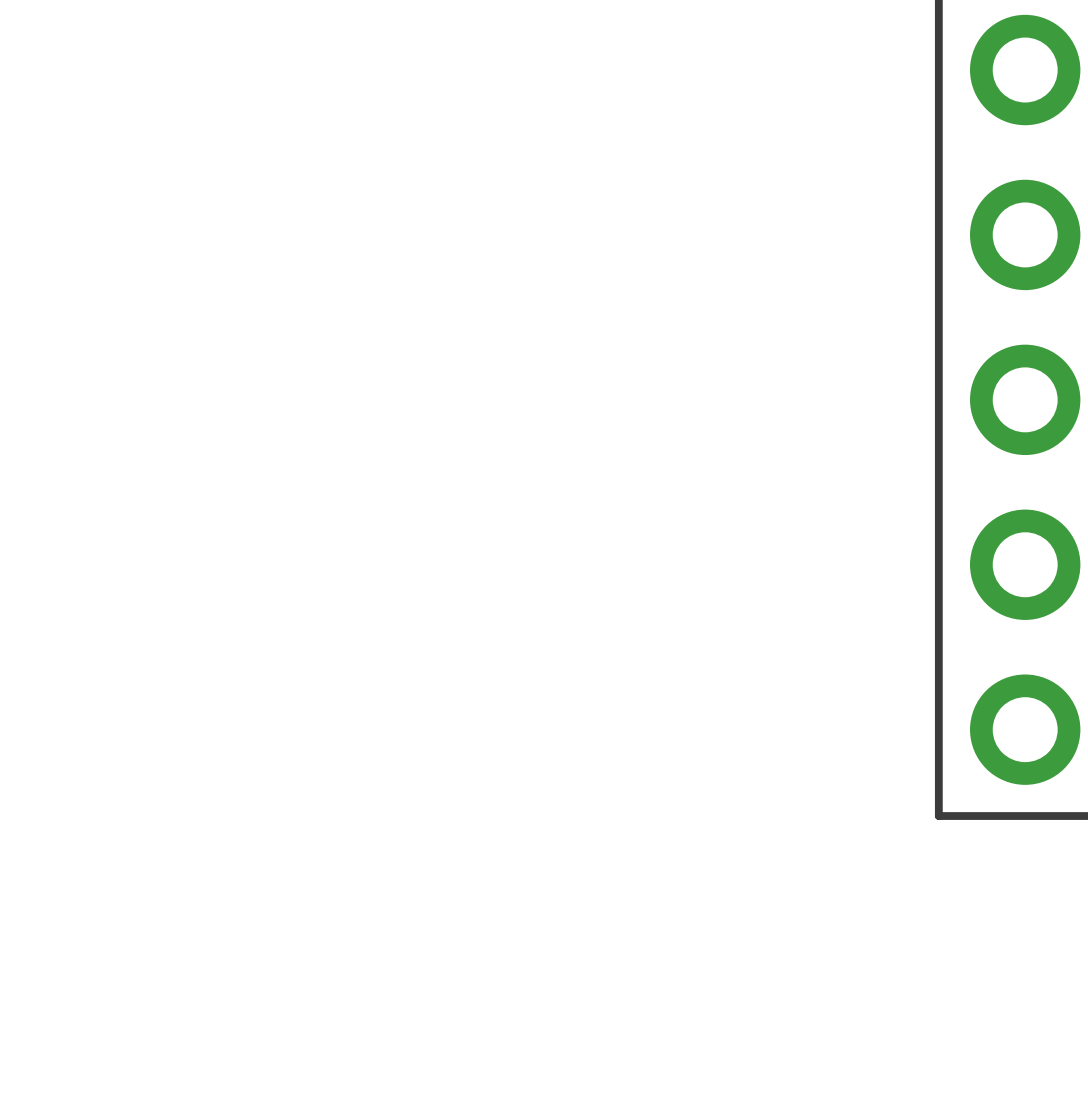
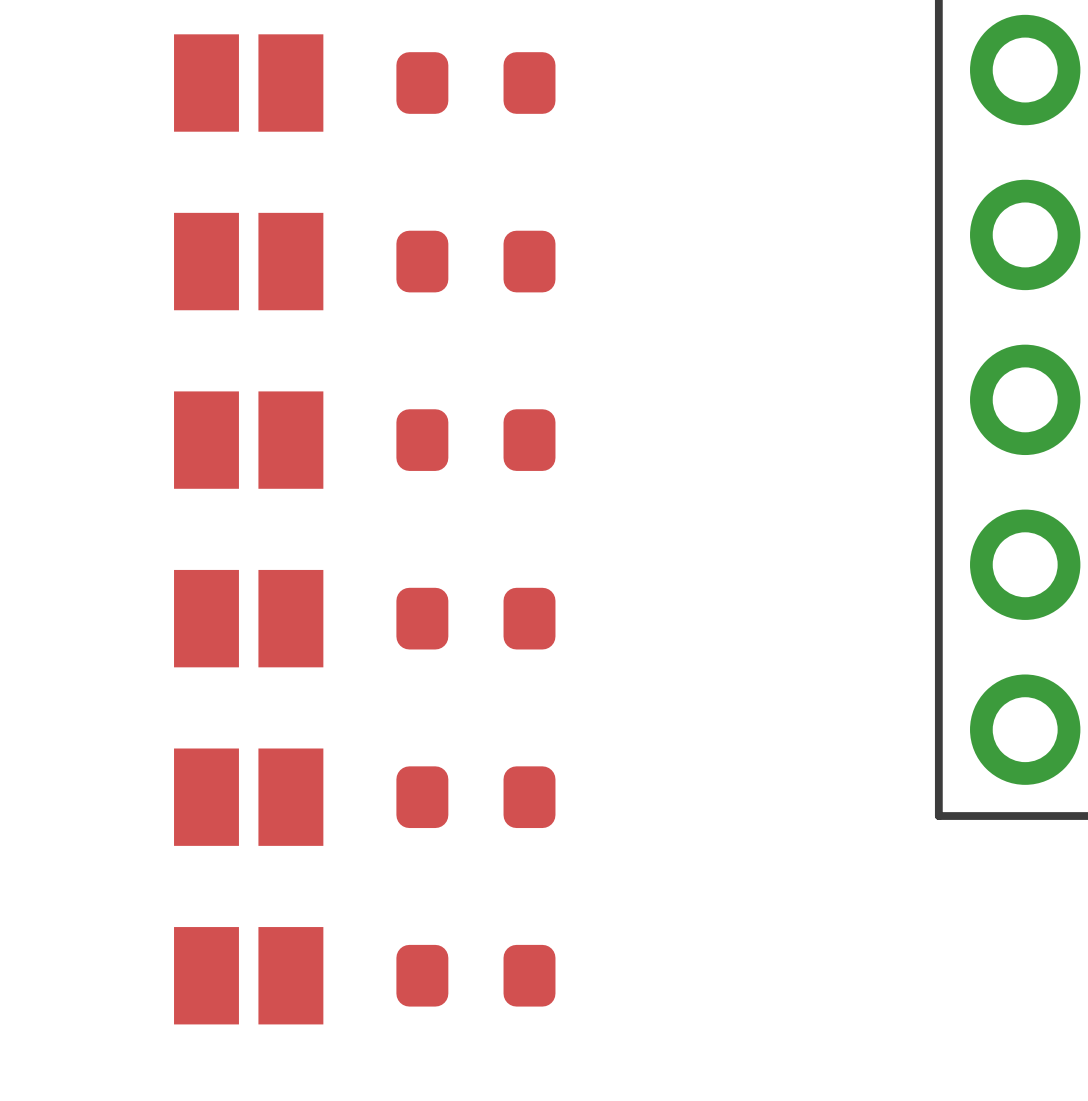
part: none -> (248, 83)
part: none -> (475, 83)
part: none -> (248, 261)
part: none -> (475, 261)
part: none -> (248, 440)
part: none -> (475, 440)
part: none -> (248, 618)
part: none -> (475, 618)
part: none -> (248, 797)
part: none -> (475, 797)
part: none -> (248, 975)
part: none -> (475, 975)

